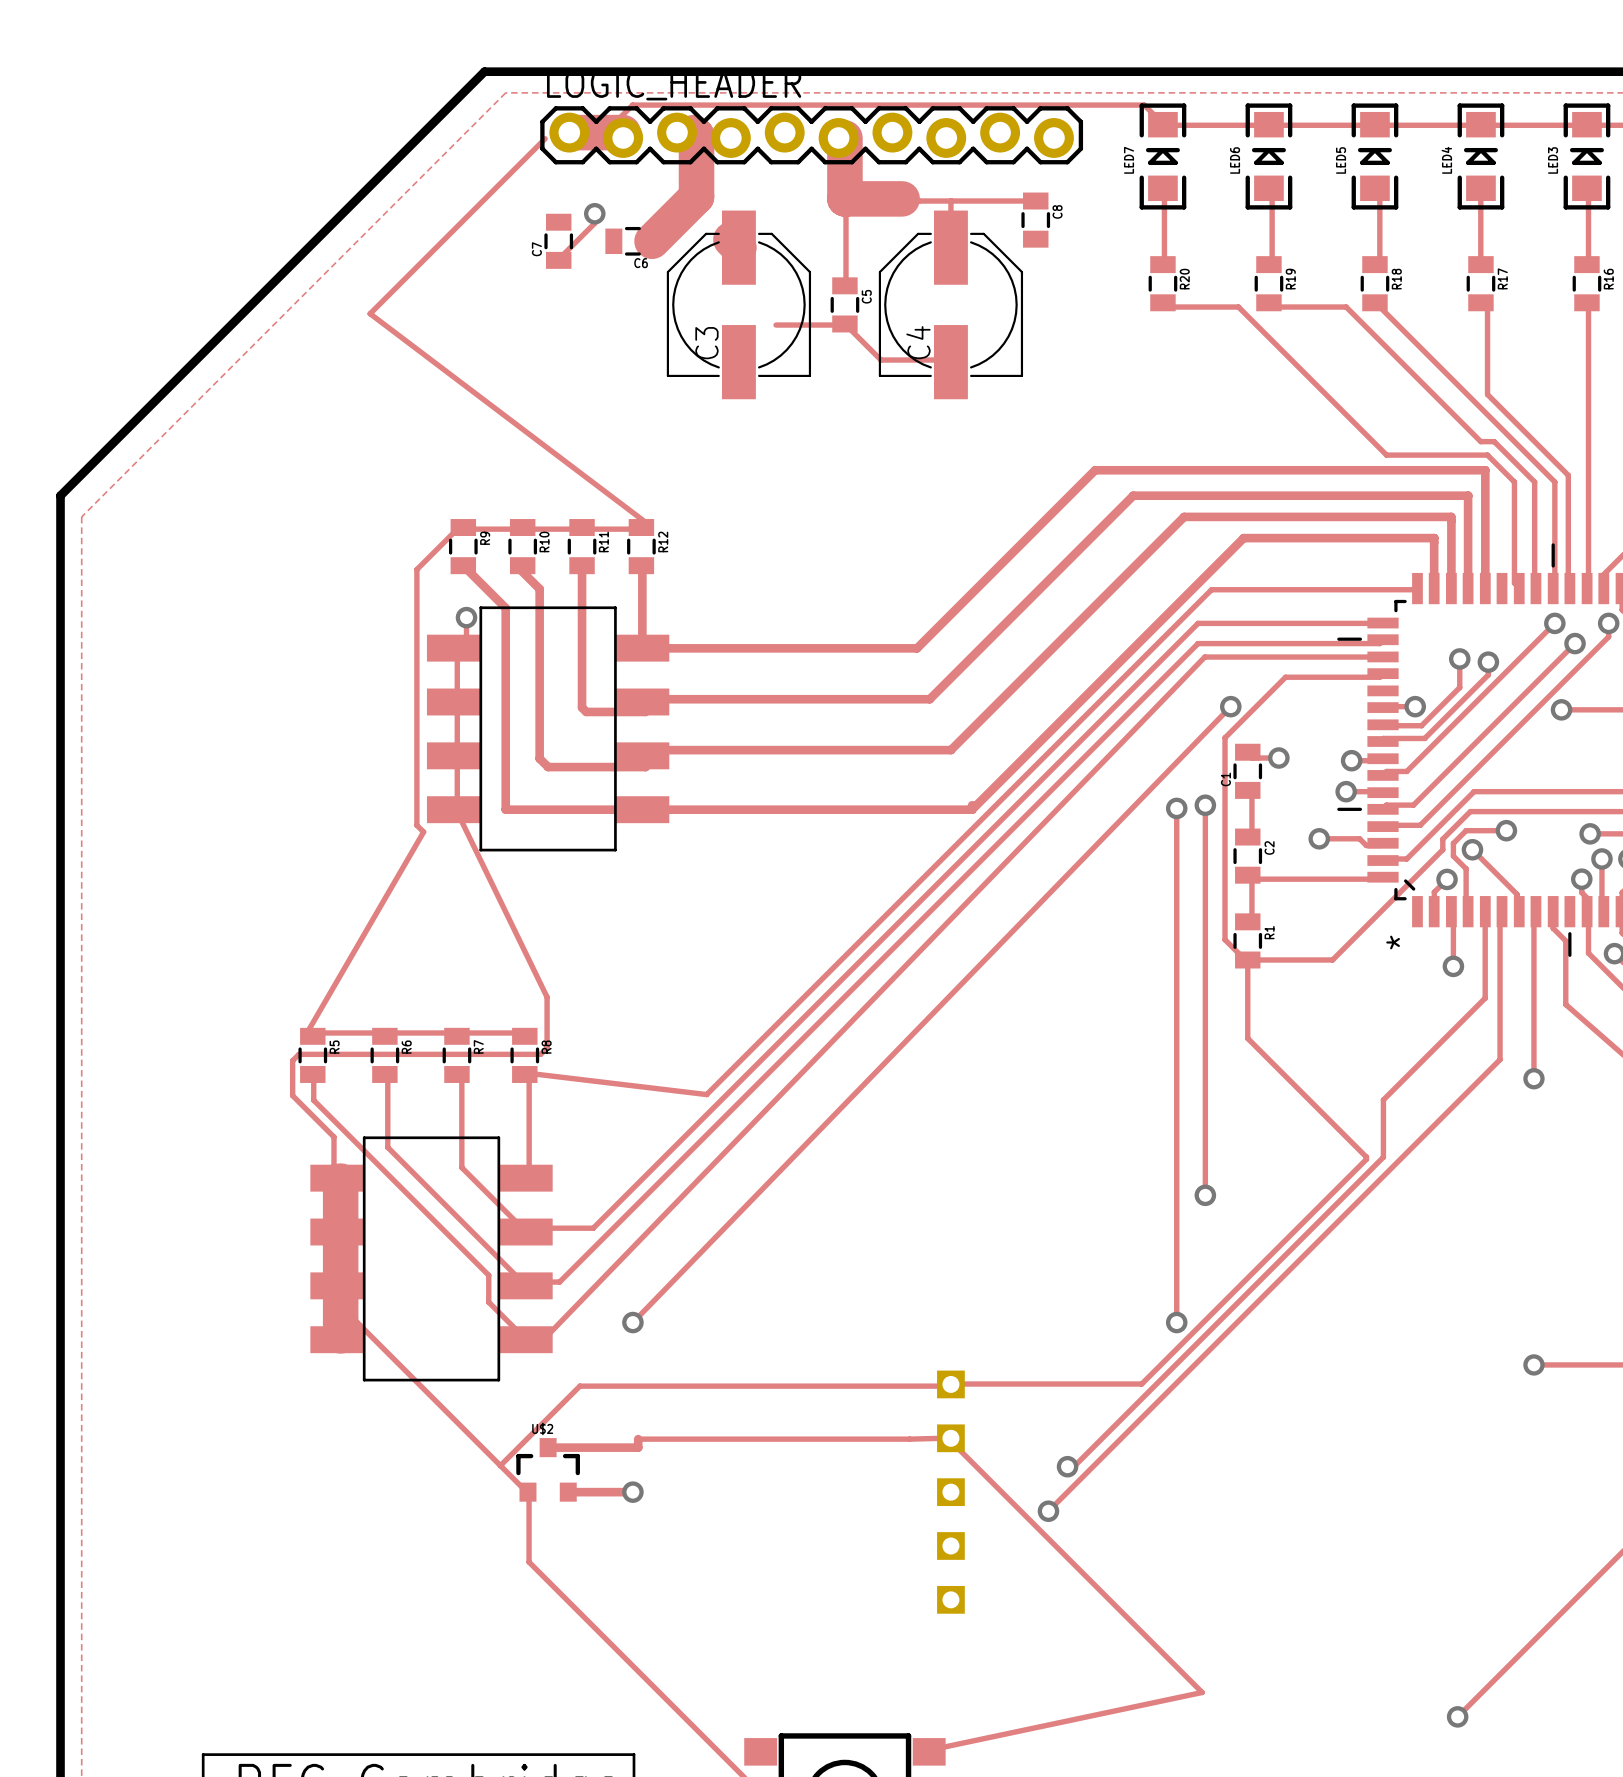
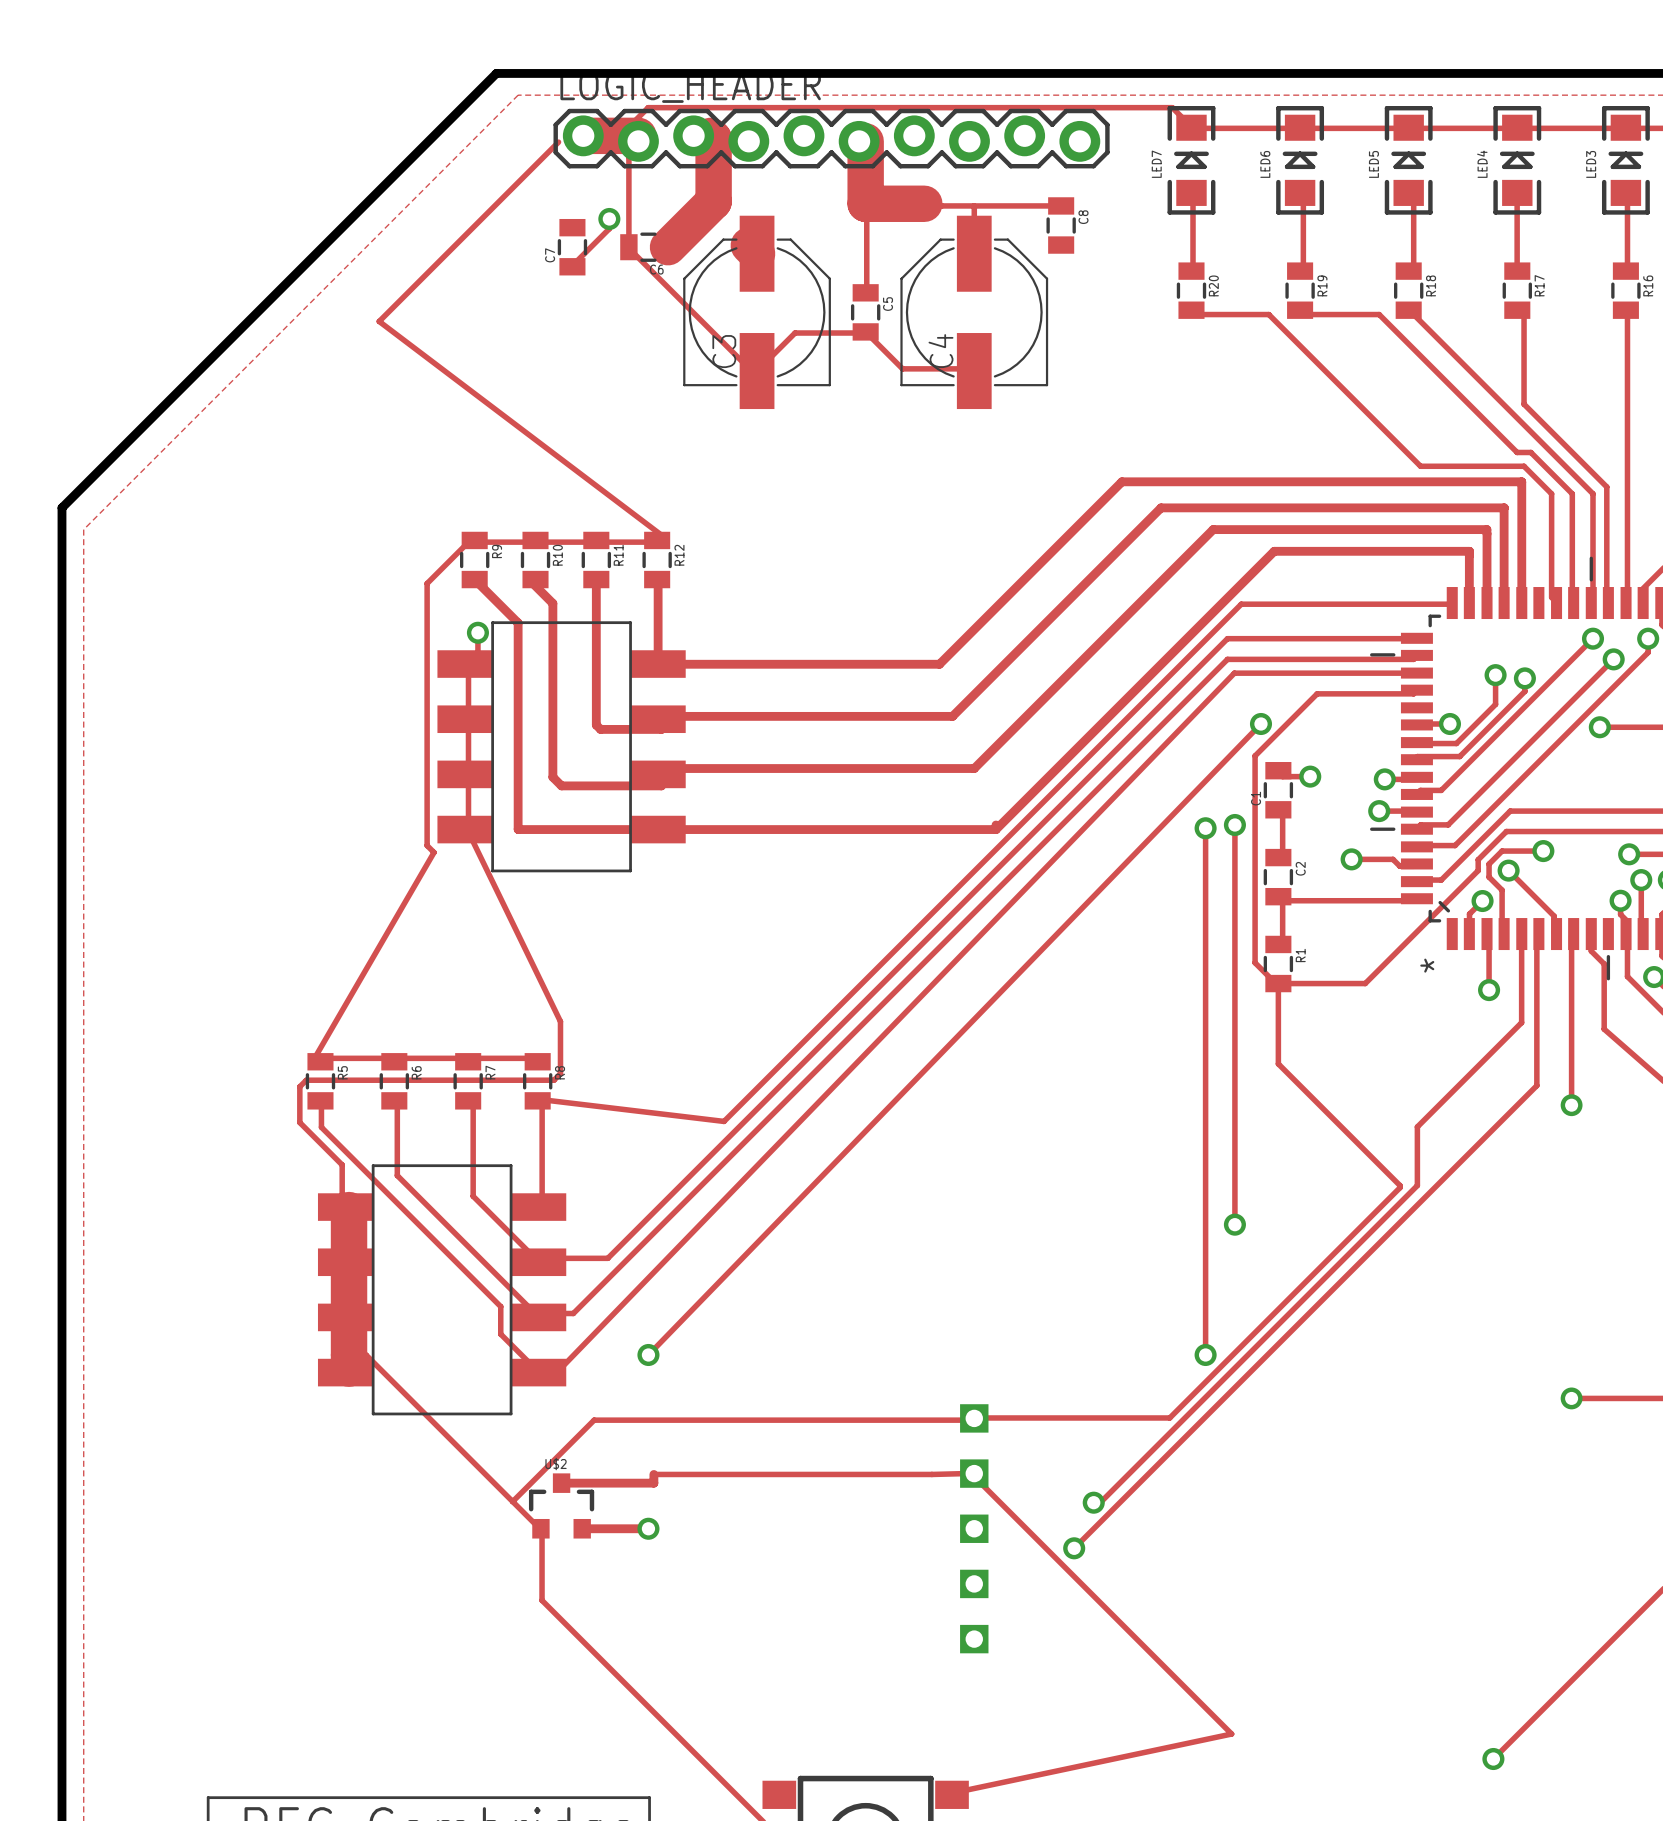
track: none -> (638, 141) (628, 157) (628, 248) (749, 368) (755, 368) (757, 371) (795, 333)

